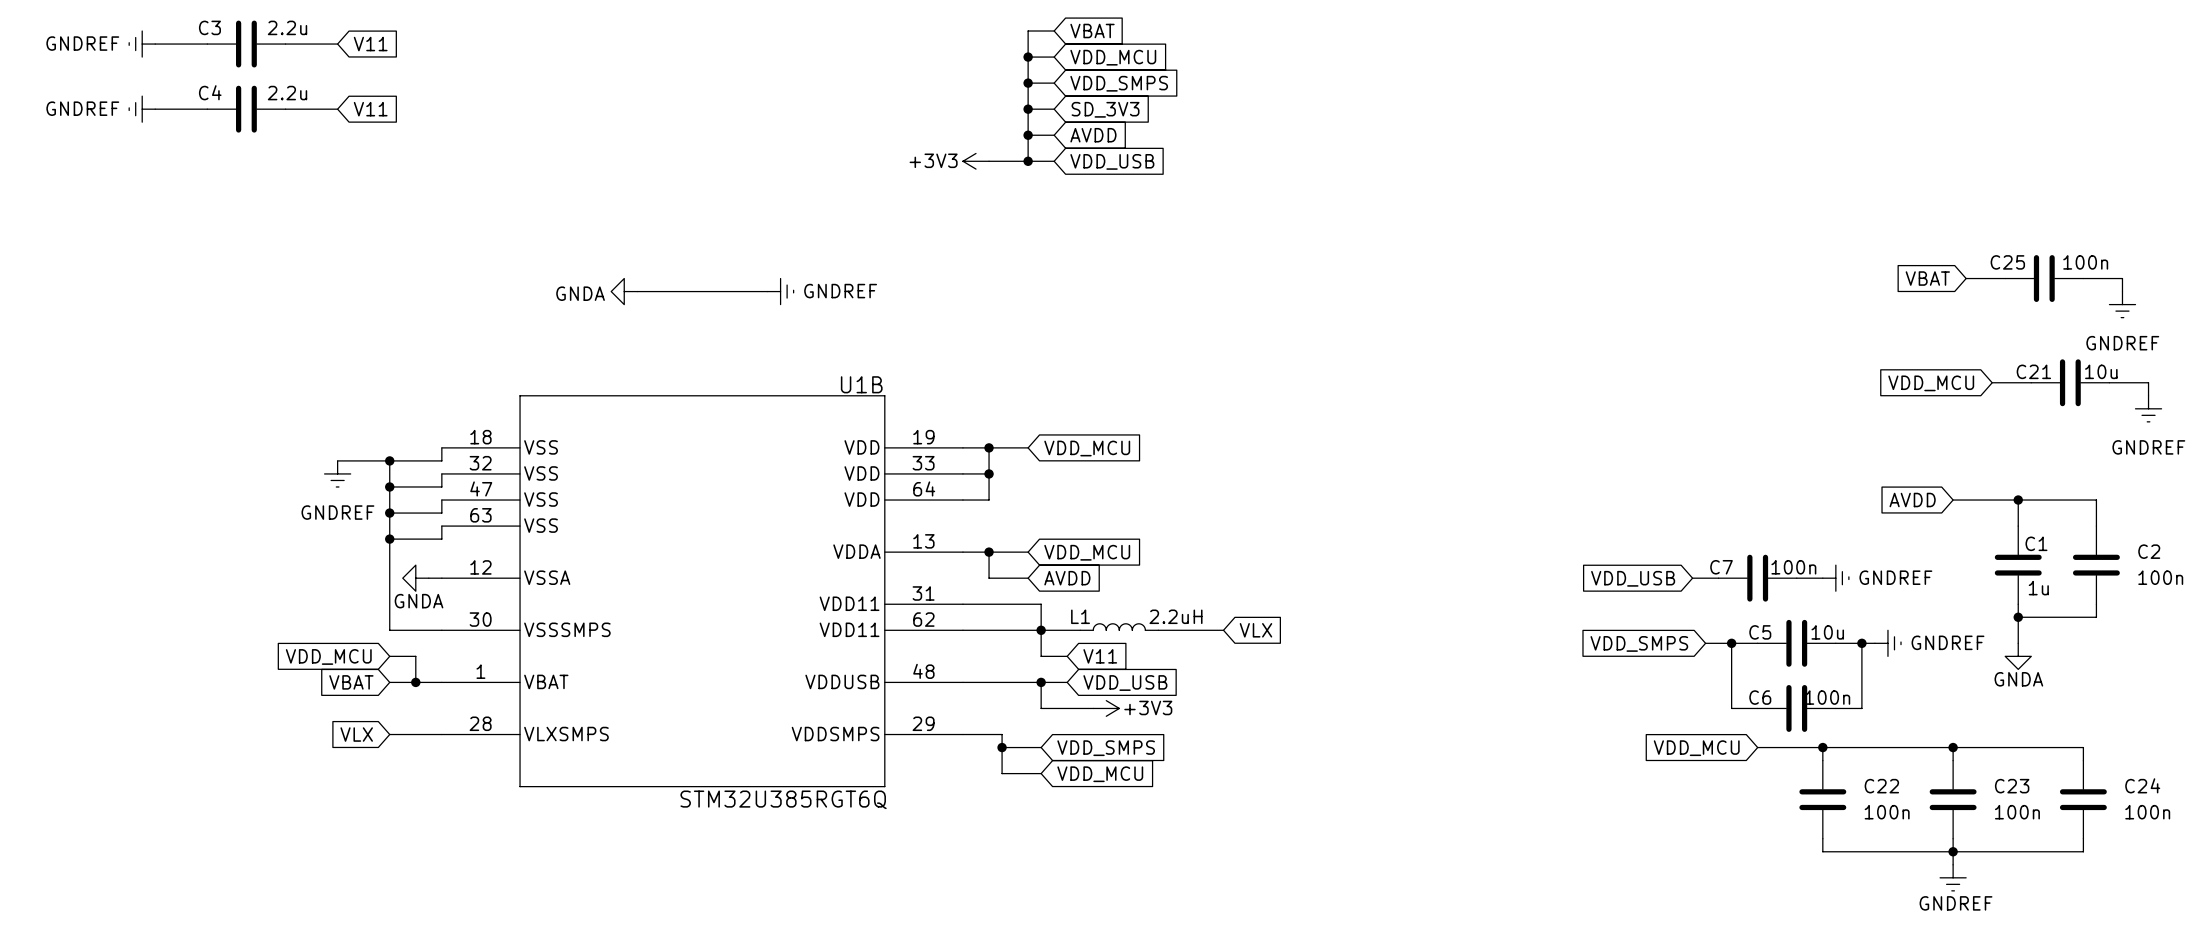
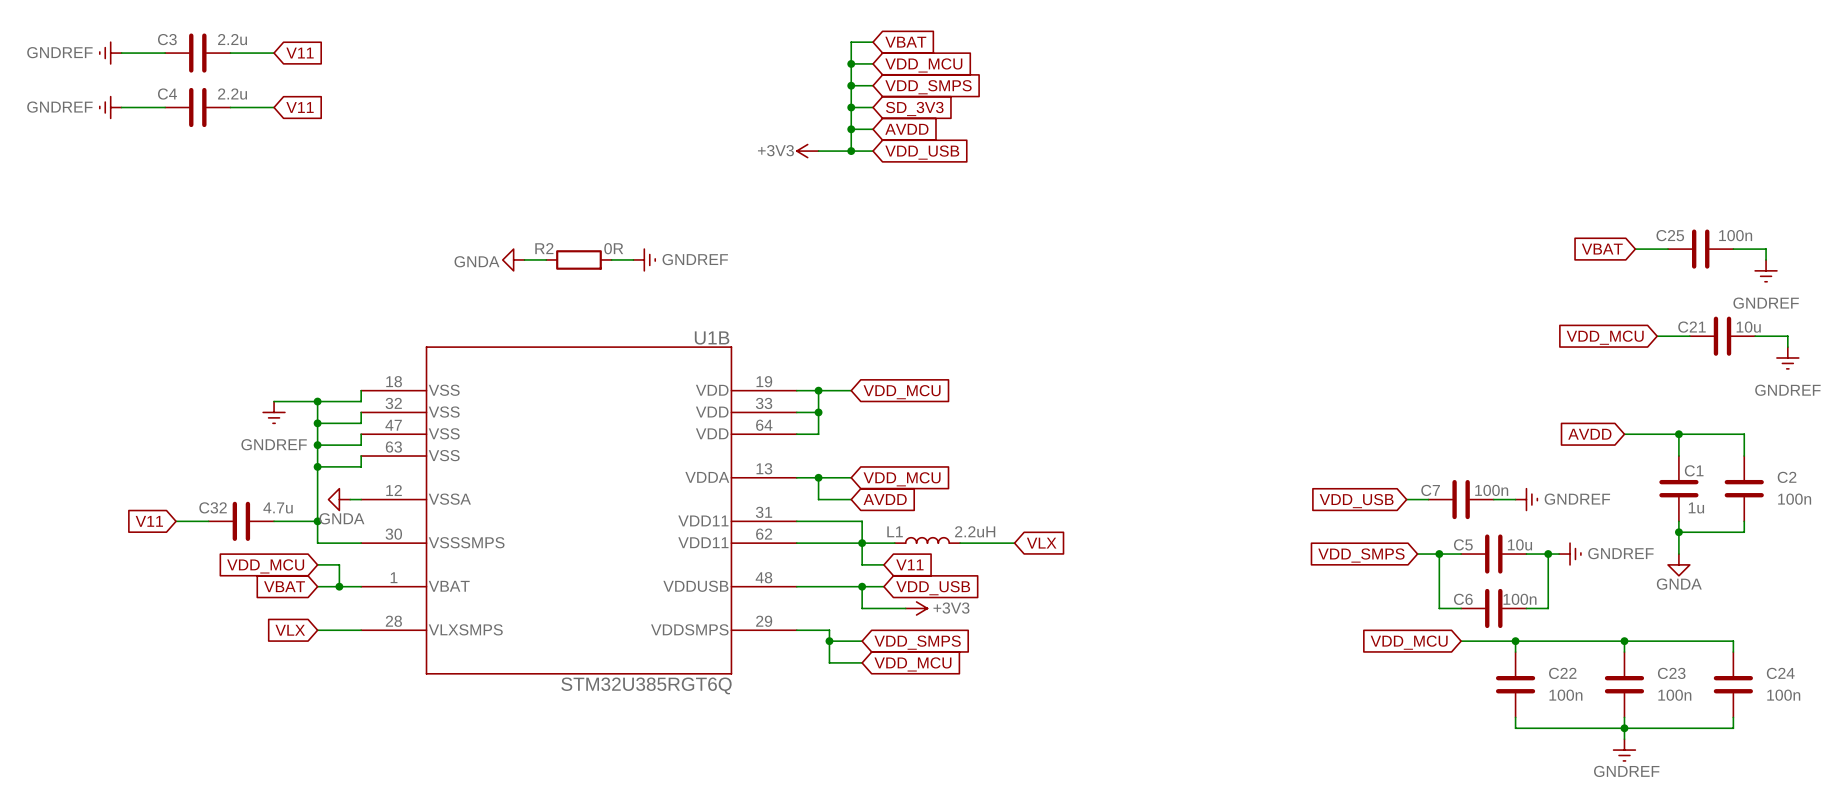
wire: (663, 291) (741, 291) -> none
R2: none -> 0R (578, 259)
global label: none -> V11 (149, 521)
wire: none -> (176, 521) (208, 521)
C32: none -> 4.7u (241, 521)
wire: none -> (274, 521) (317, 521)
junction: none -> (317, 521)

